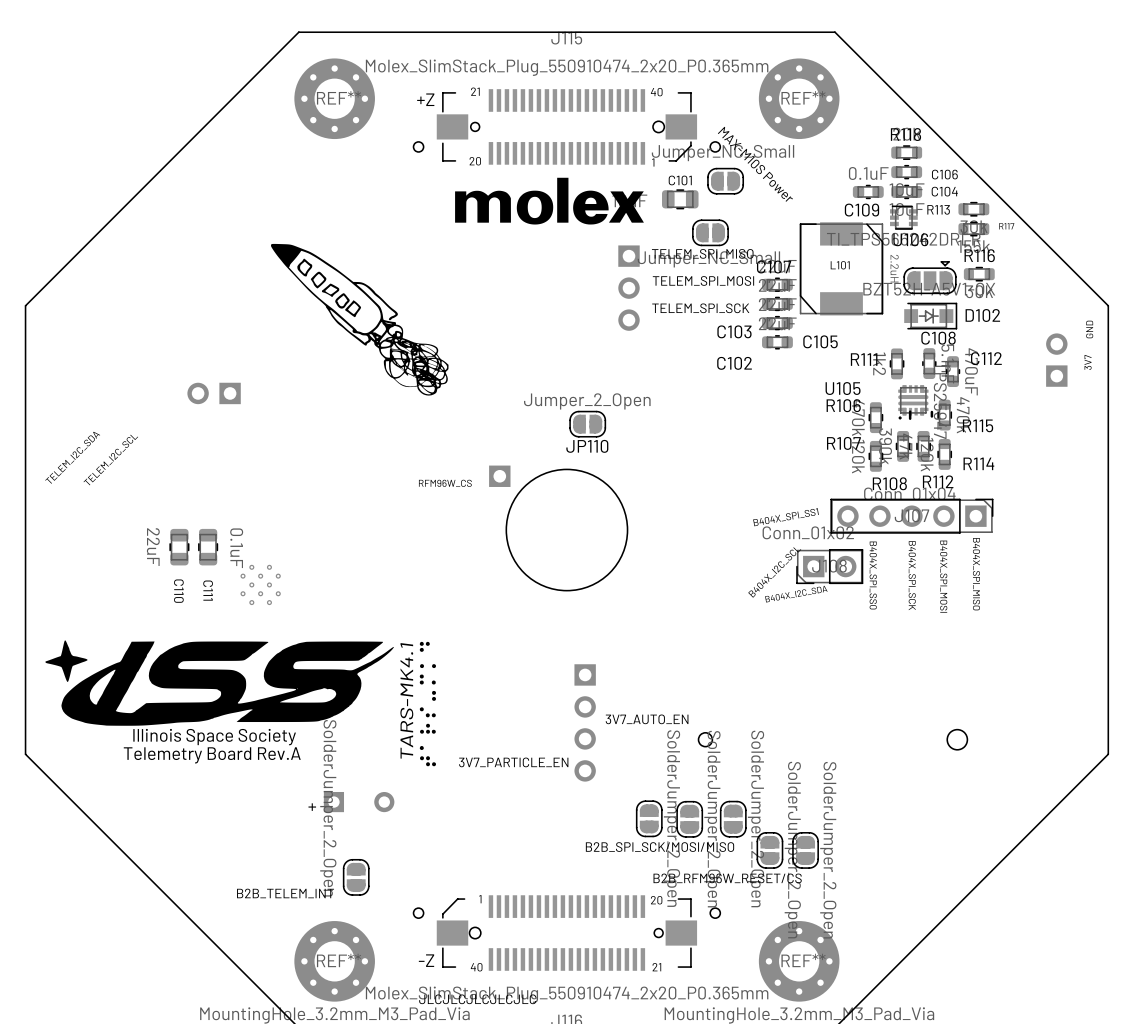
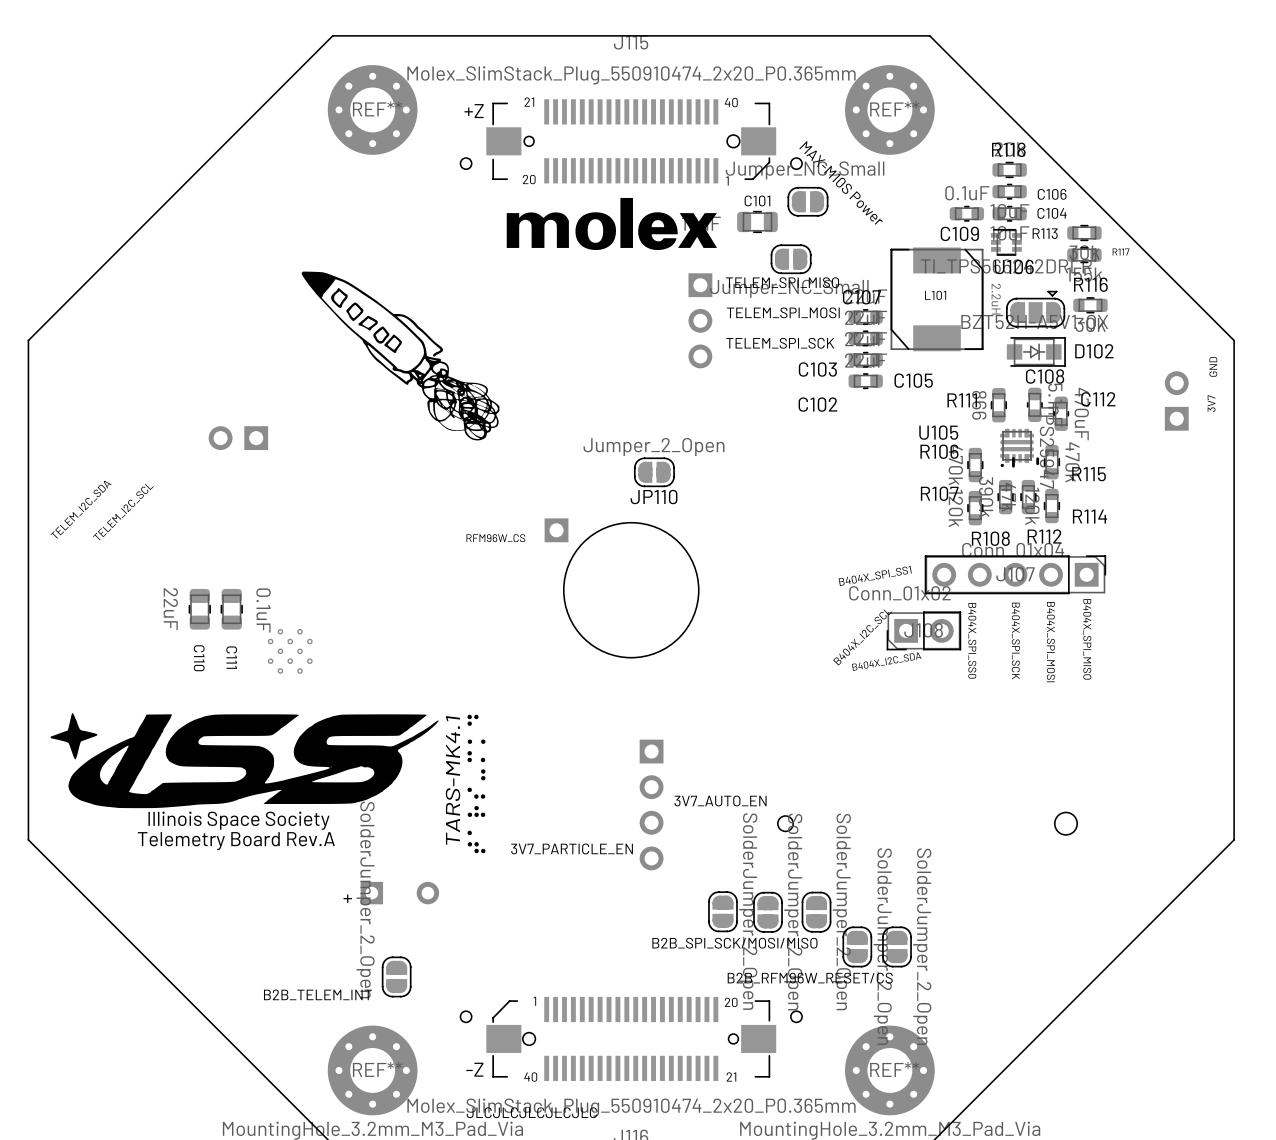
R111 value: 1k2 (879, 363) -> 866 (979, 405)

